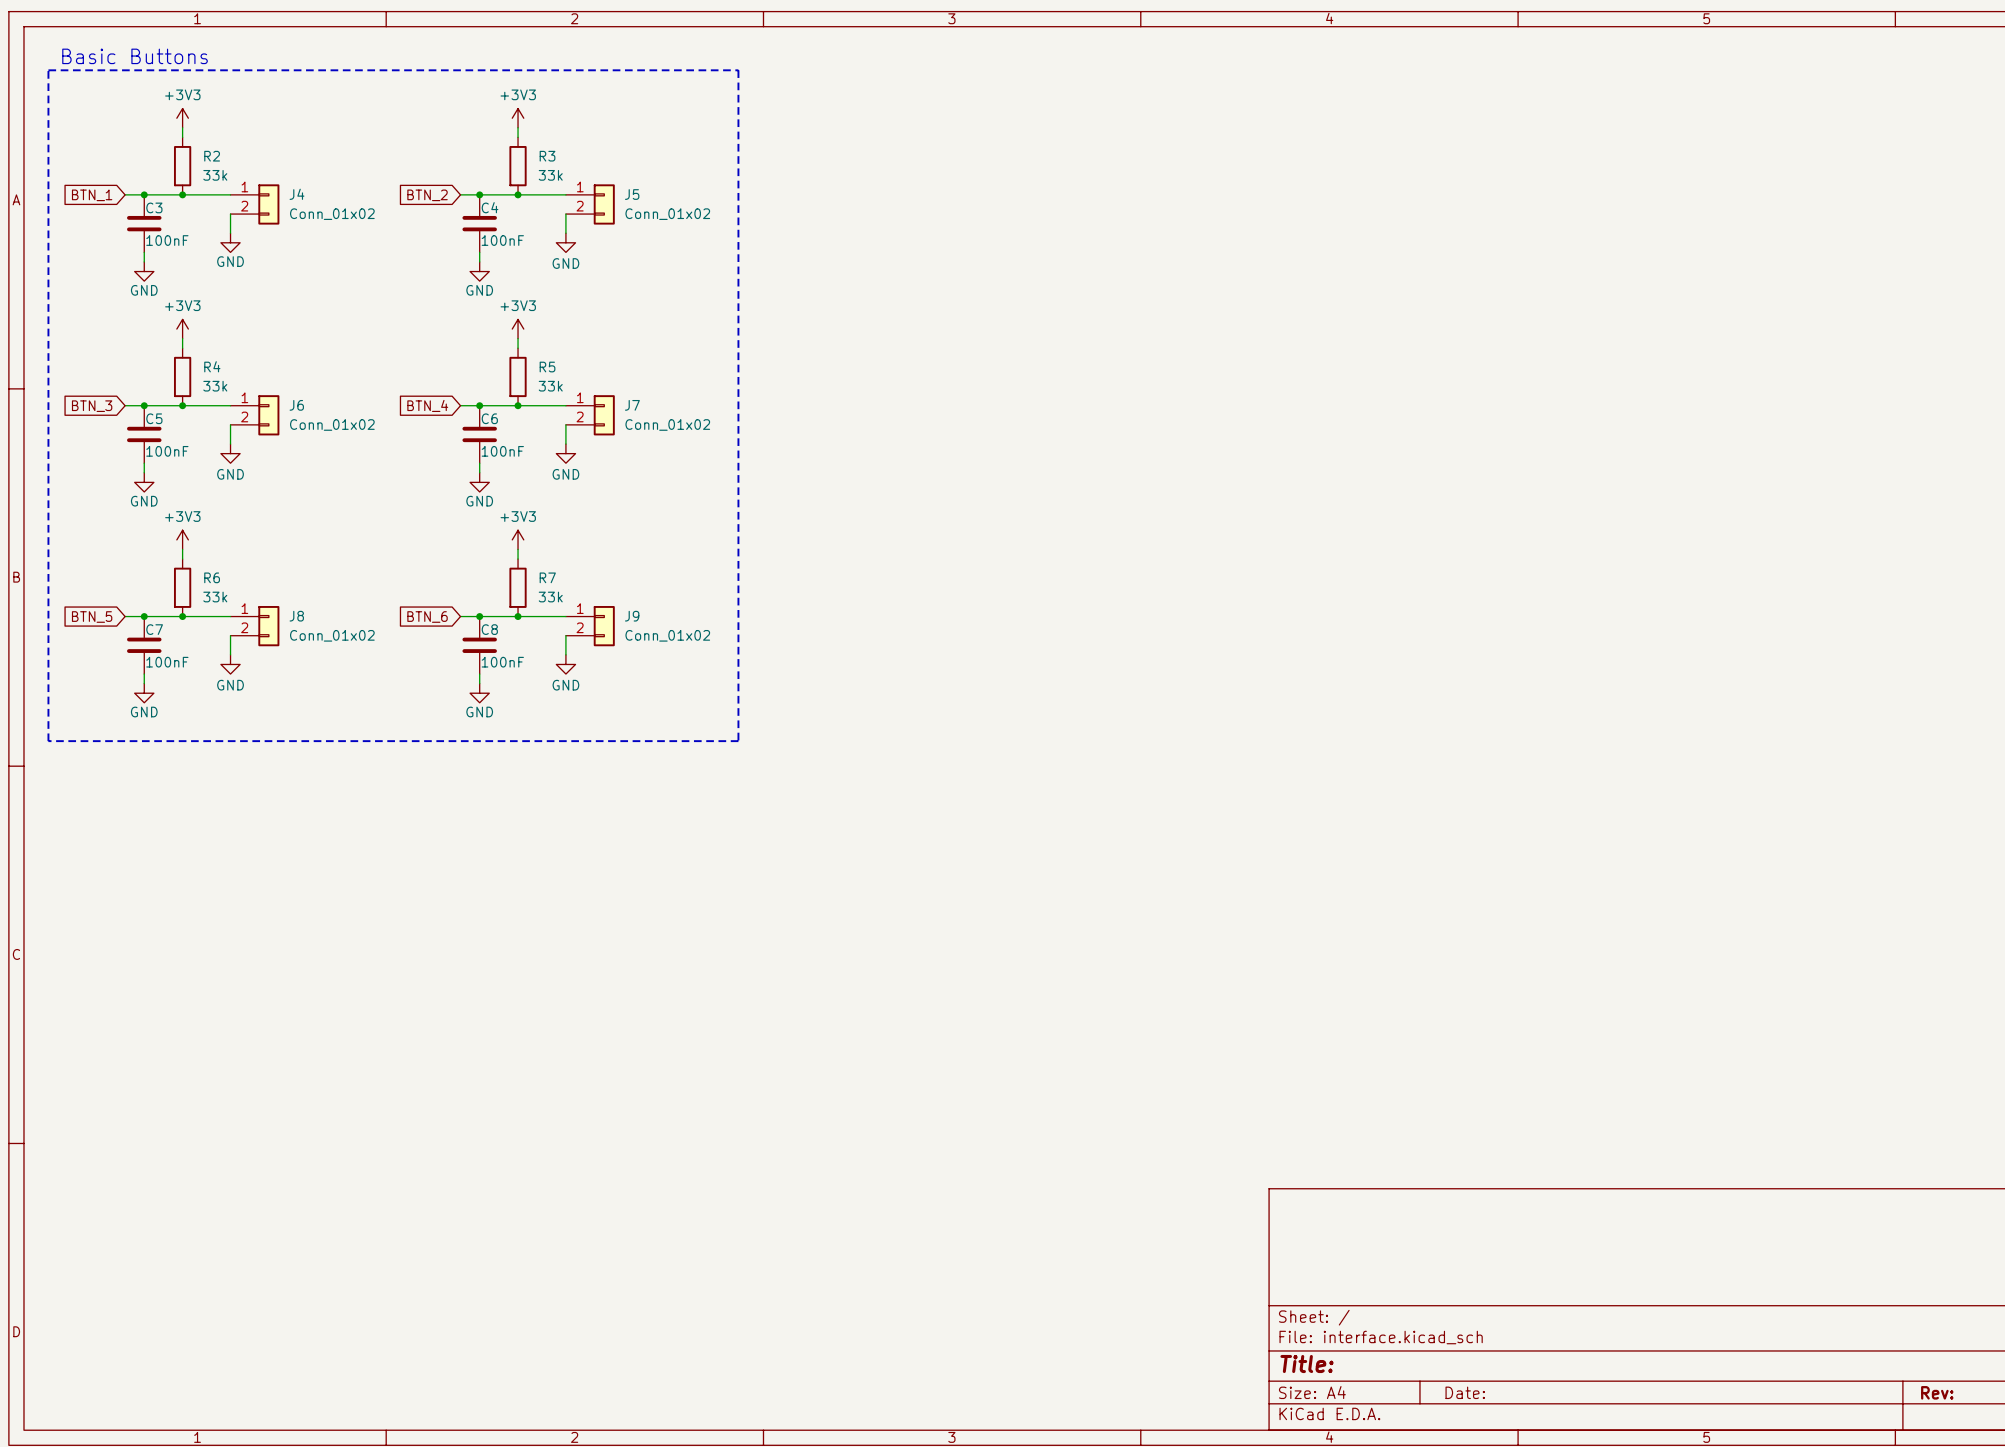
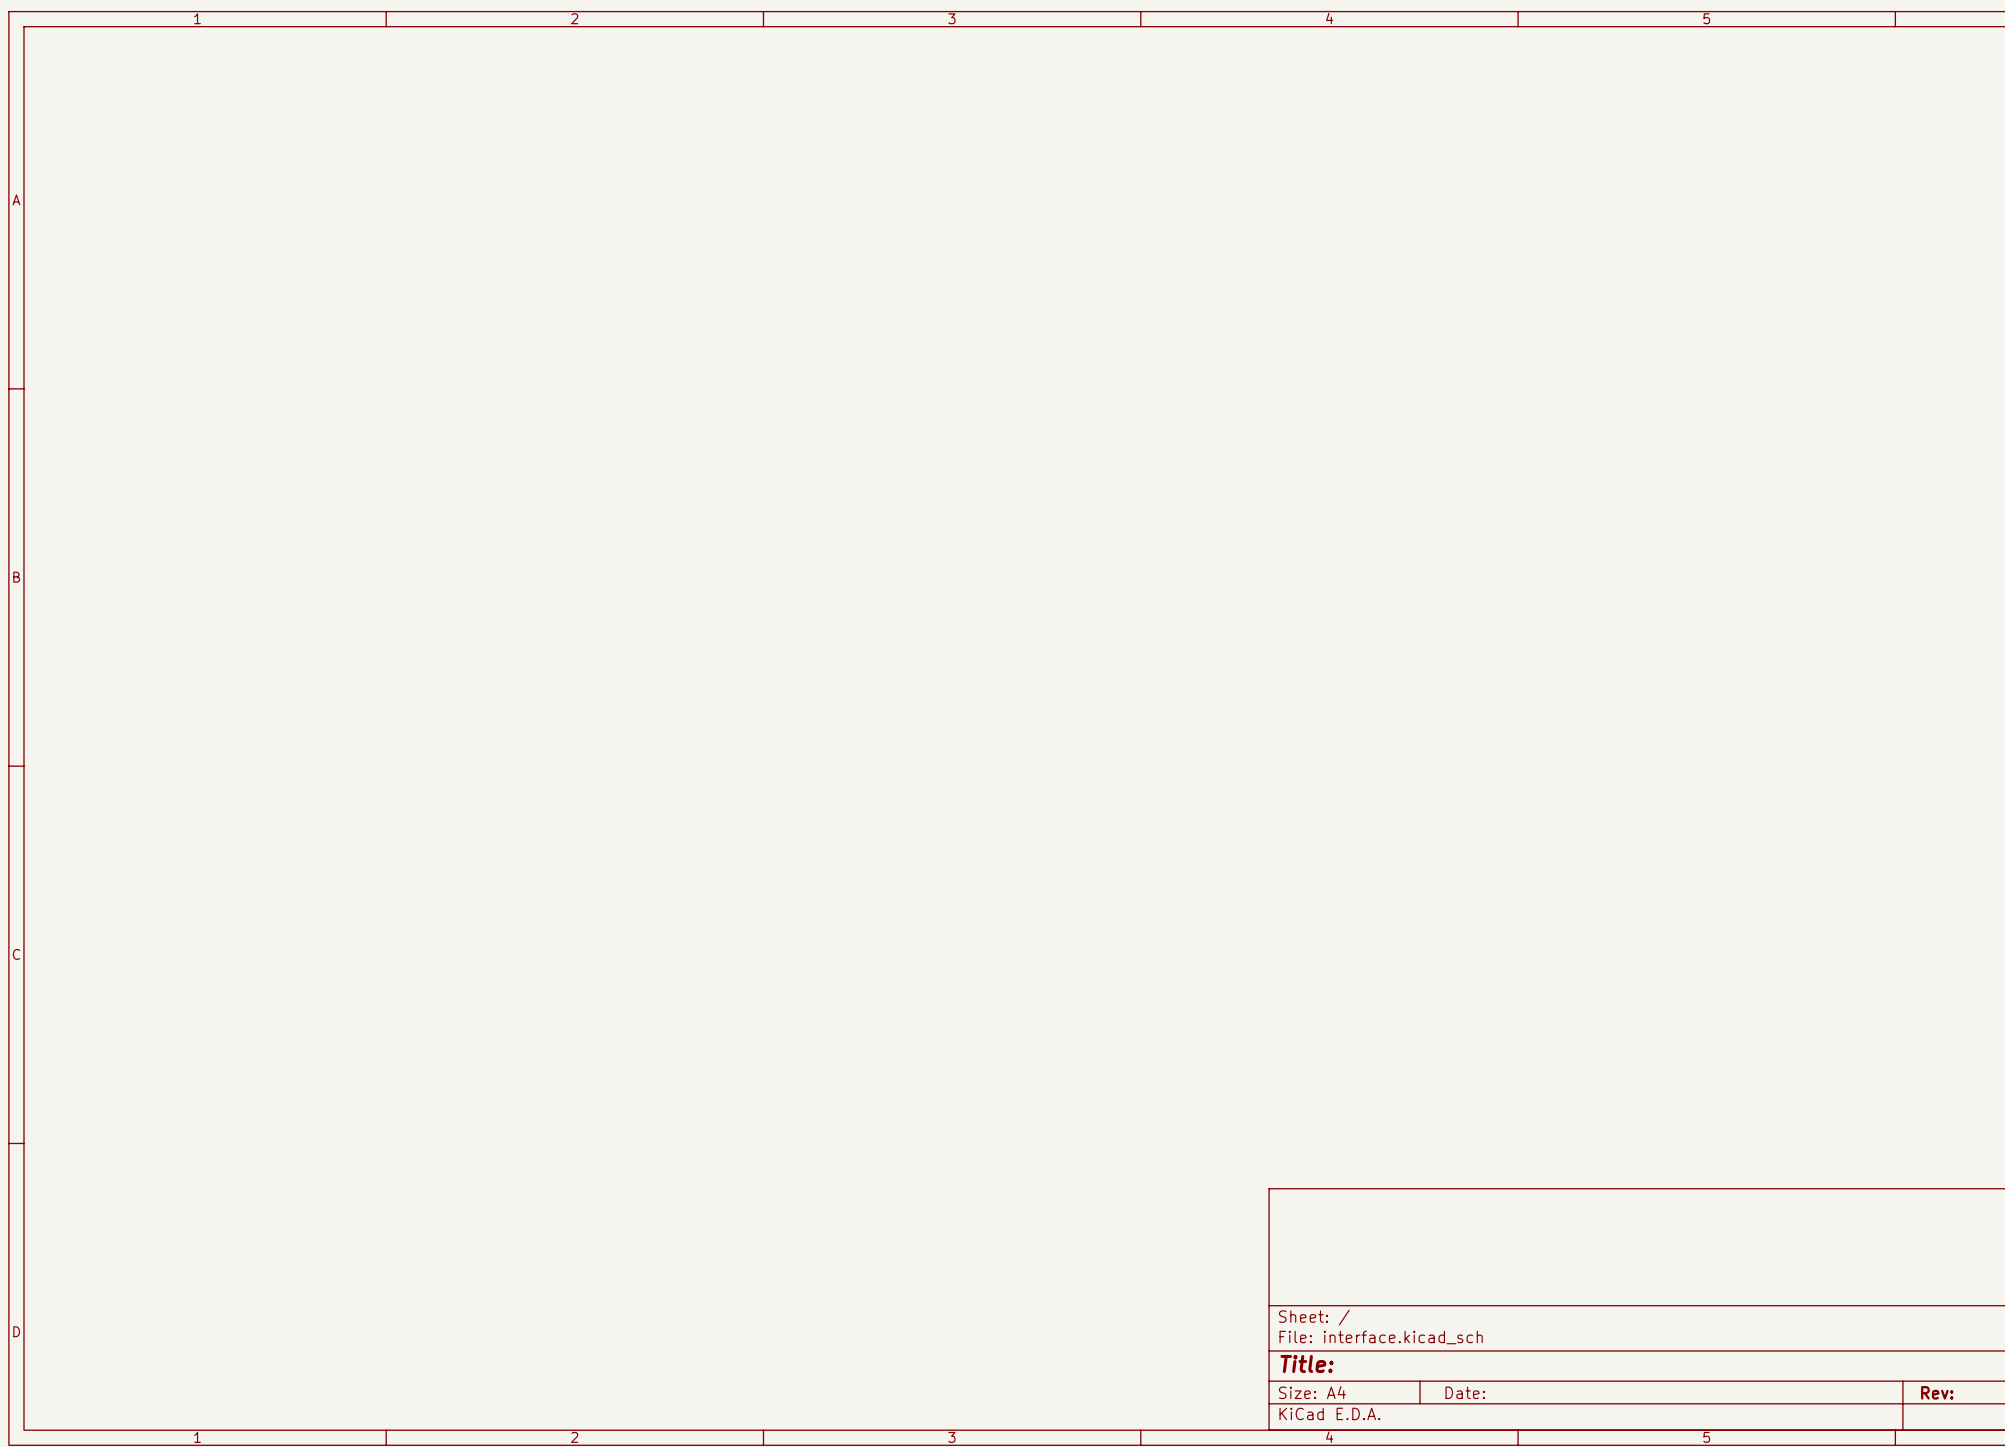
text: Basic Buttons (135, 56) -> none
line: (48, 70) (738, 70) (738, 741) (48, 741) (48, 70) -> none
power symbol: +3V3 (182, 118) -> none
power symbol: +3V3 (518, 118) -> none
wire: (182, 127) (182, 137) -> none
wire: (518, 127) (518, 137) -> none
R2: 33k (182, 166) -> none
R3: 33k (518, 166) -> none
wire: (125, 194) (230, 194) -> none
junction: (144, 194) -> none
junction: (182, 194) -> none
wire: (460, 194) (565, 194) -> none
junction: (479, 194) -> none
junction: (518, 194) -> none
global label: BTN_1 (92, 195) -> none
global label: BTN_2 (427, 195) -> none
J4: Conn_01x02 (254, 204) -> none
J5: Conn_01x02 (590, 204) -> none
wire: (230, 214) (230, 233) -> none
wire: (565, 214) (565, 233) -> none
C3: 100nF (144, 223) -> none
C4: 100nF (479, 223) -> none
power symbol: GND (230, 242) -> none
power symbol: GND (565, 242) -> none
wire: (144, 252) (144, 261) -> none
wire: (479, 252) (479, 261) -> none
power symbol: GND (144, 271) -> none
power symbol: GND (479, 271) -> none
power symbol: +3V3 (182, 329) -> none
power symbol: +3V3 (518, 329) -> none
wire: (182, 338) (182, 348) -> none
wire: (518, 338) (518, 348) -> none
R4: 33k (182, 376) -> none
R5: 33k (518, 376) -> none
wire: (125, 405) (230, 405) -> none
junction: (144, 405) -> none
junction: (182, 405) -> none
global label: BTN_4 (427, 405) -> none
wire: (460, 405) (565, 405) -> none
junction: (479, 405) -> none
junction: (518, 405) -> none
global label: BTN_3 (92, 406) -> none
J6: Conn_01x02 (254, 415) -> none
J7: Conn_01x02 (590, 415) -> none
wire: (230, 424) (230, 444) -> none
wire: (565, 424) (565, 444) -> none
C5: 100nF (144, 434) -> none
C6: 100nF (479, 434) -> none
power symbol: GND (230, 453) -> none
power symbol: GND (565, 453) -> none
wire: (144, 463) (144, 472) -> none
wire: (479, 463) (479, 472) -> none
power symbol: GND (144, 482) -> none
power symbol: GND (479, 482) -> none
power symbol: +3V3 (182, 539) -> none
power symbol: +3V3 (518, 539) -> none
wire: (182, 549) (182, 559) -> none
wire: (518, 549) (518, 559) -> none
R6: 33k (182, 587) -> none
R7: 33k (518, 587) -> none
wire: (125, 616) (230, 616) -> none
junction: (144, 616) -> none
junction: (182, 616) -> none
wire: (460, 616) (565, 616) -> none
junction: (479, 616) -> none
junction: (518, 616) -> none
global label: BTN_5 (92, 617) -> none
global label: BTN_6 (427, 617) -> none
J8: Conn_01x02 (254, 626) -> none
J9: Conn_01x02 (590, 626) -> none
wire: (230, 635) (230, 654) -> none
wire: (565, 635) (565, 654) -> none
C7: 100nF (144, 645) -> none
C8: 100nF (479, 645) -> none
power symbol: GND (230, 664) -> none
power symbol: GND (565, 664) -> none
wire: (144, 674) (144, 683) -> none
wire: (479, 674) (479, 683) -> none
power symbol: GND (144, 693) -> none
power symbol: GND (479, 693) -> none

